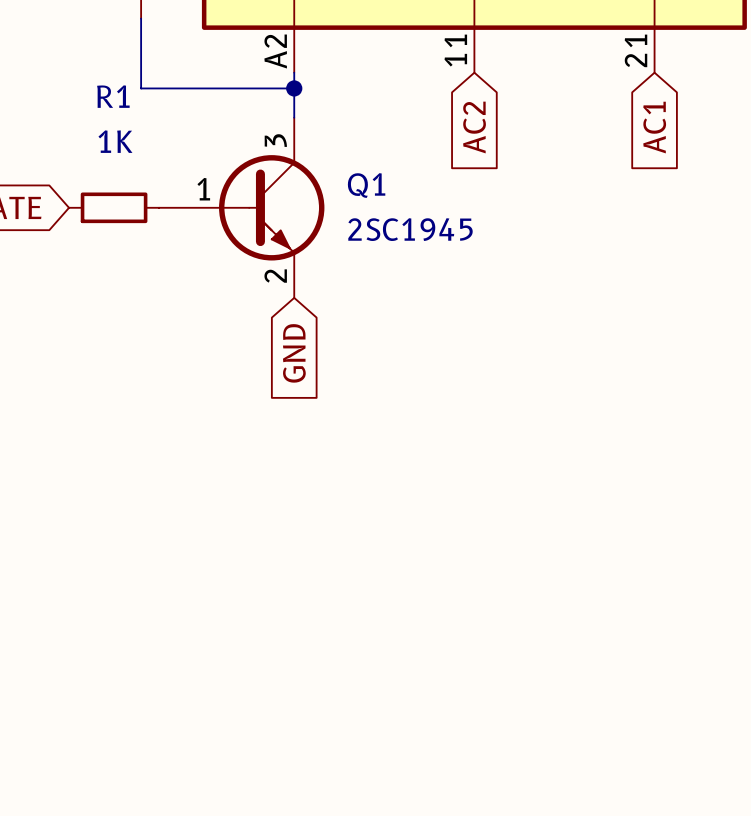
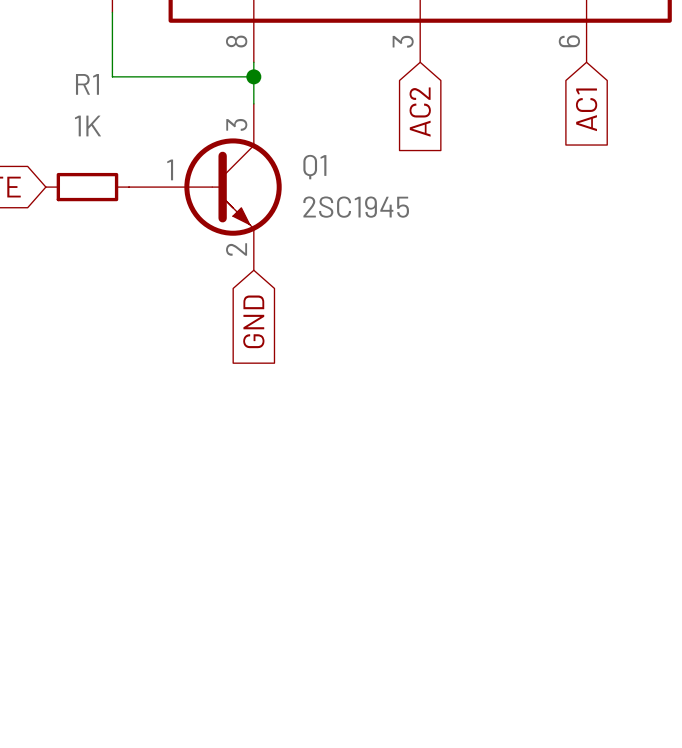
part pin number: 11 (455, 50) -> 3 (403, 41)
part pin number: 21 (635, 50) -> 6 (569, 41)
part pin number: A2 (275, 51) -> 8 (236, 41)

